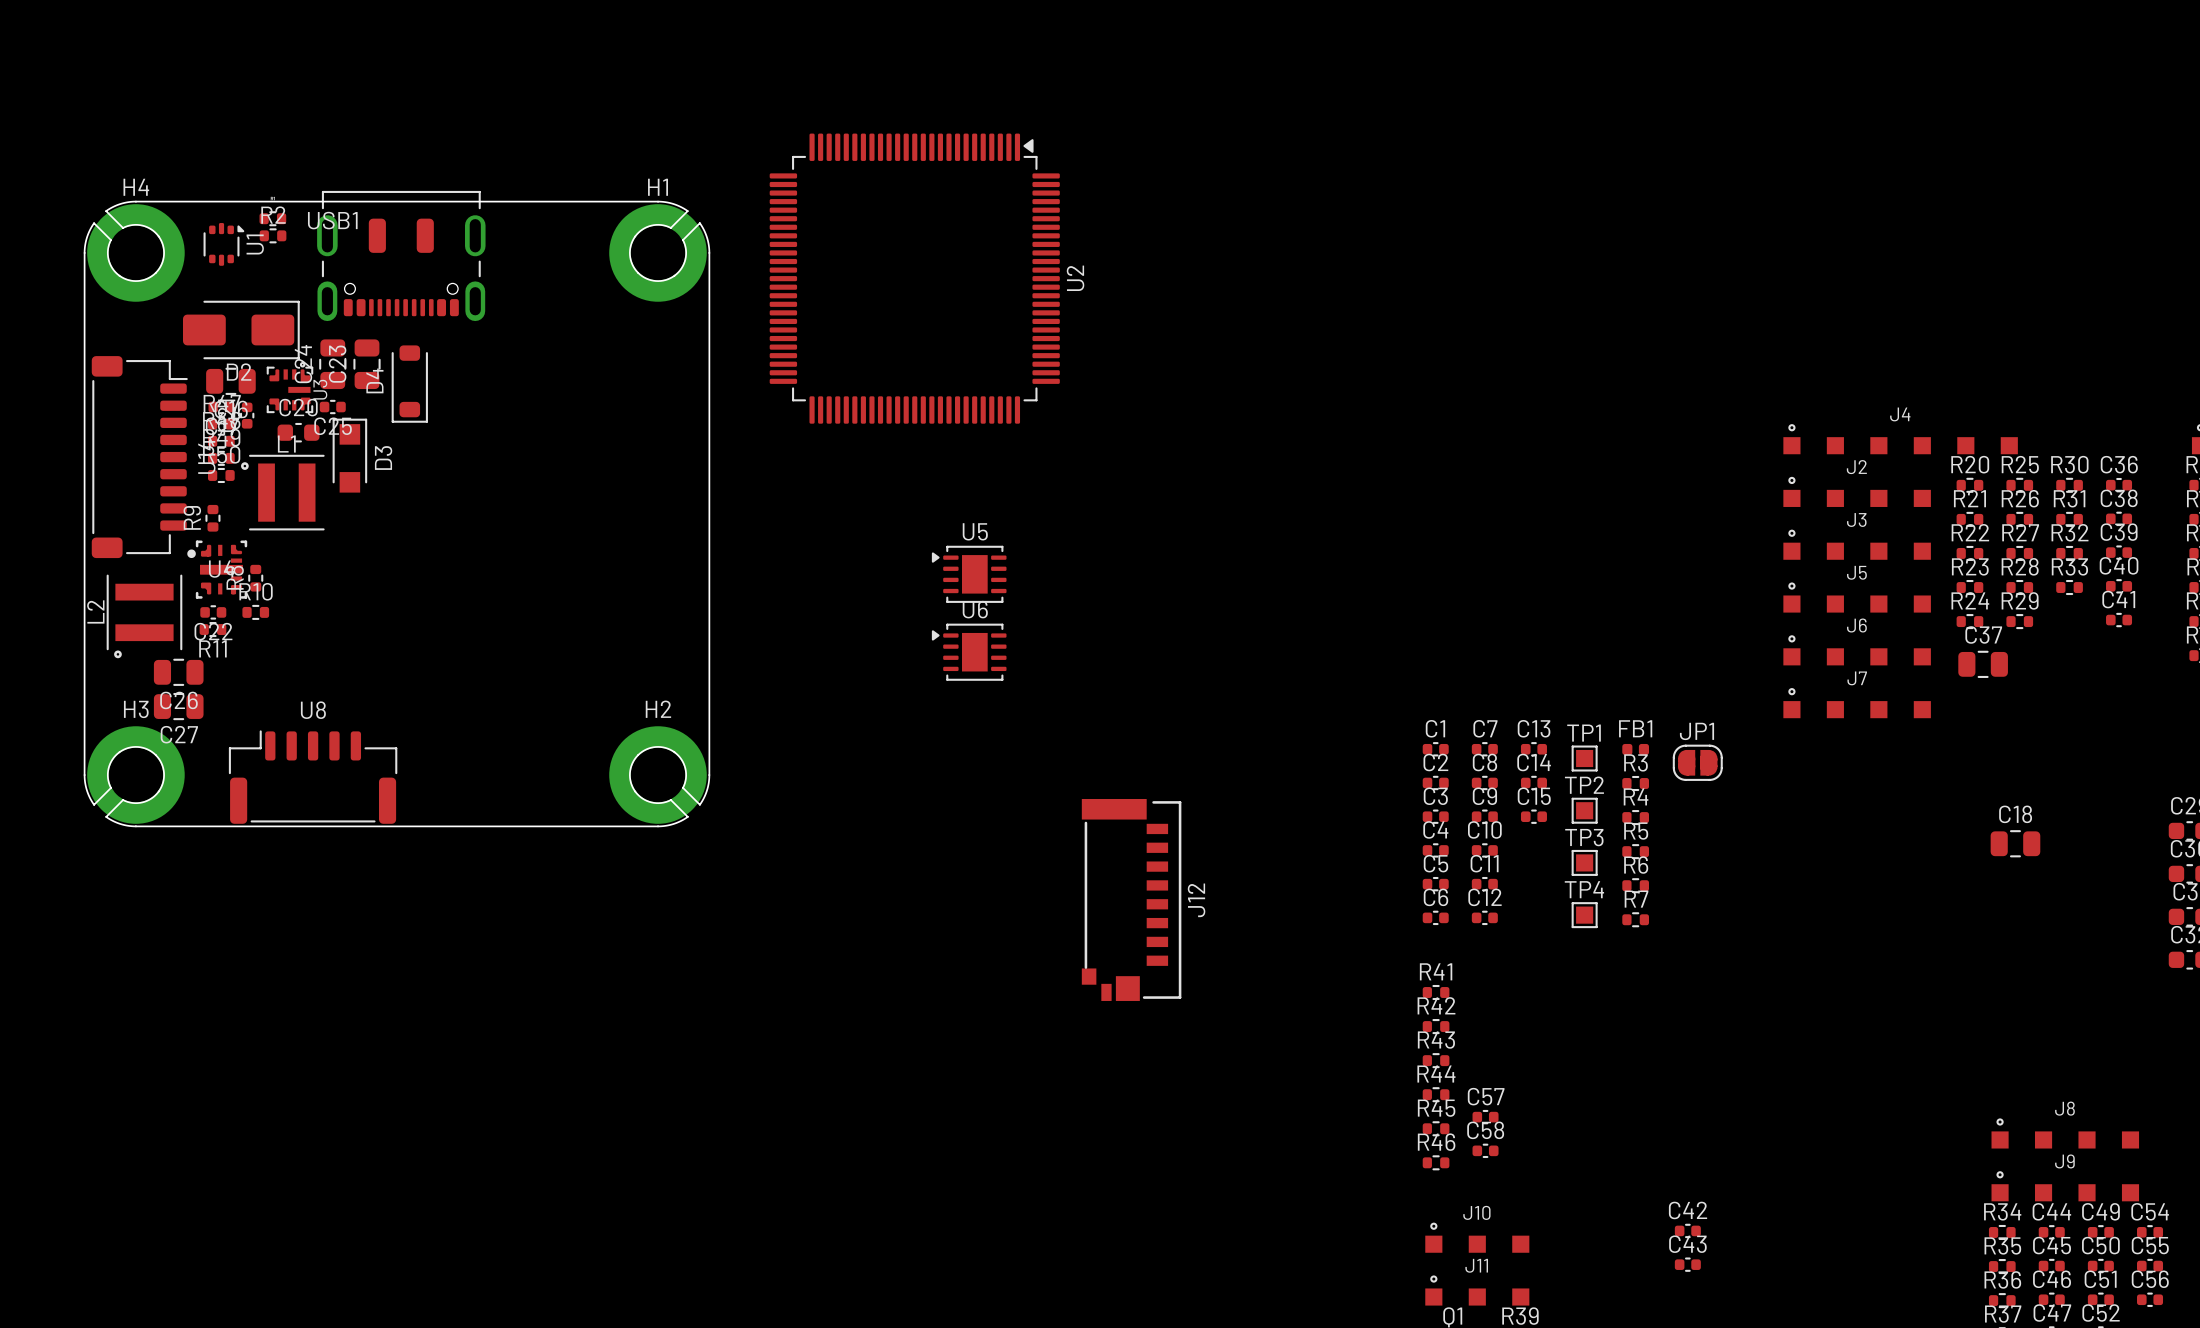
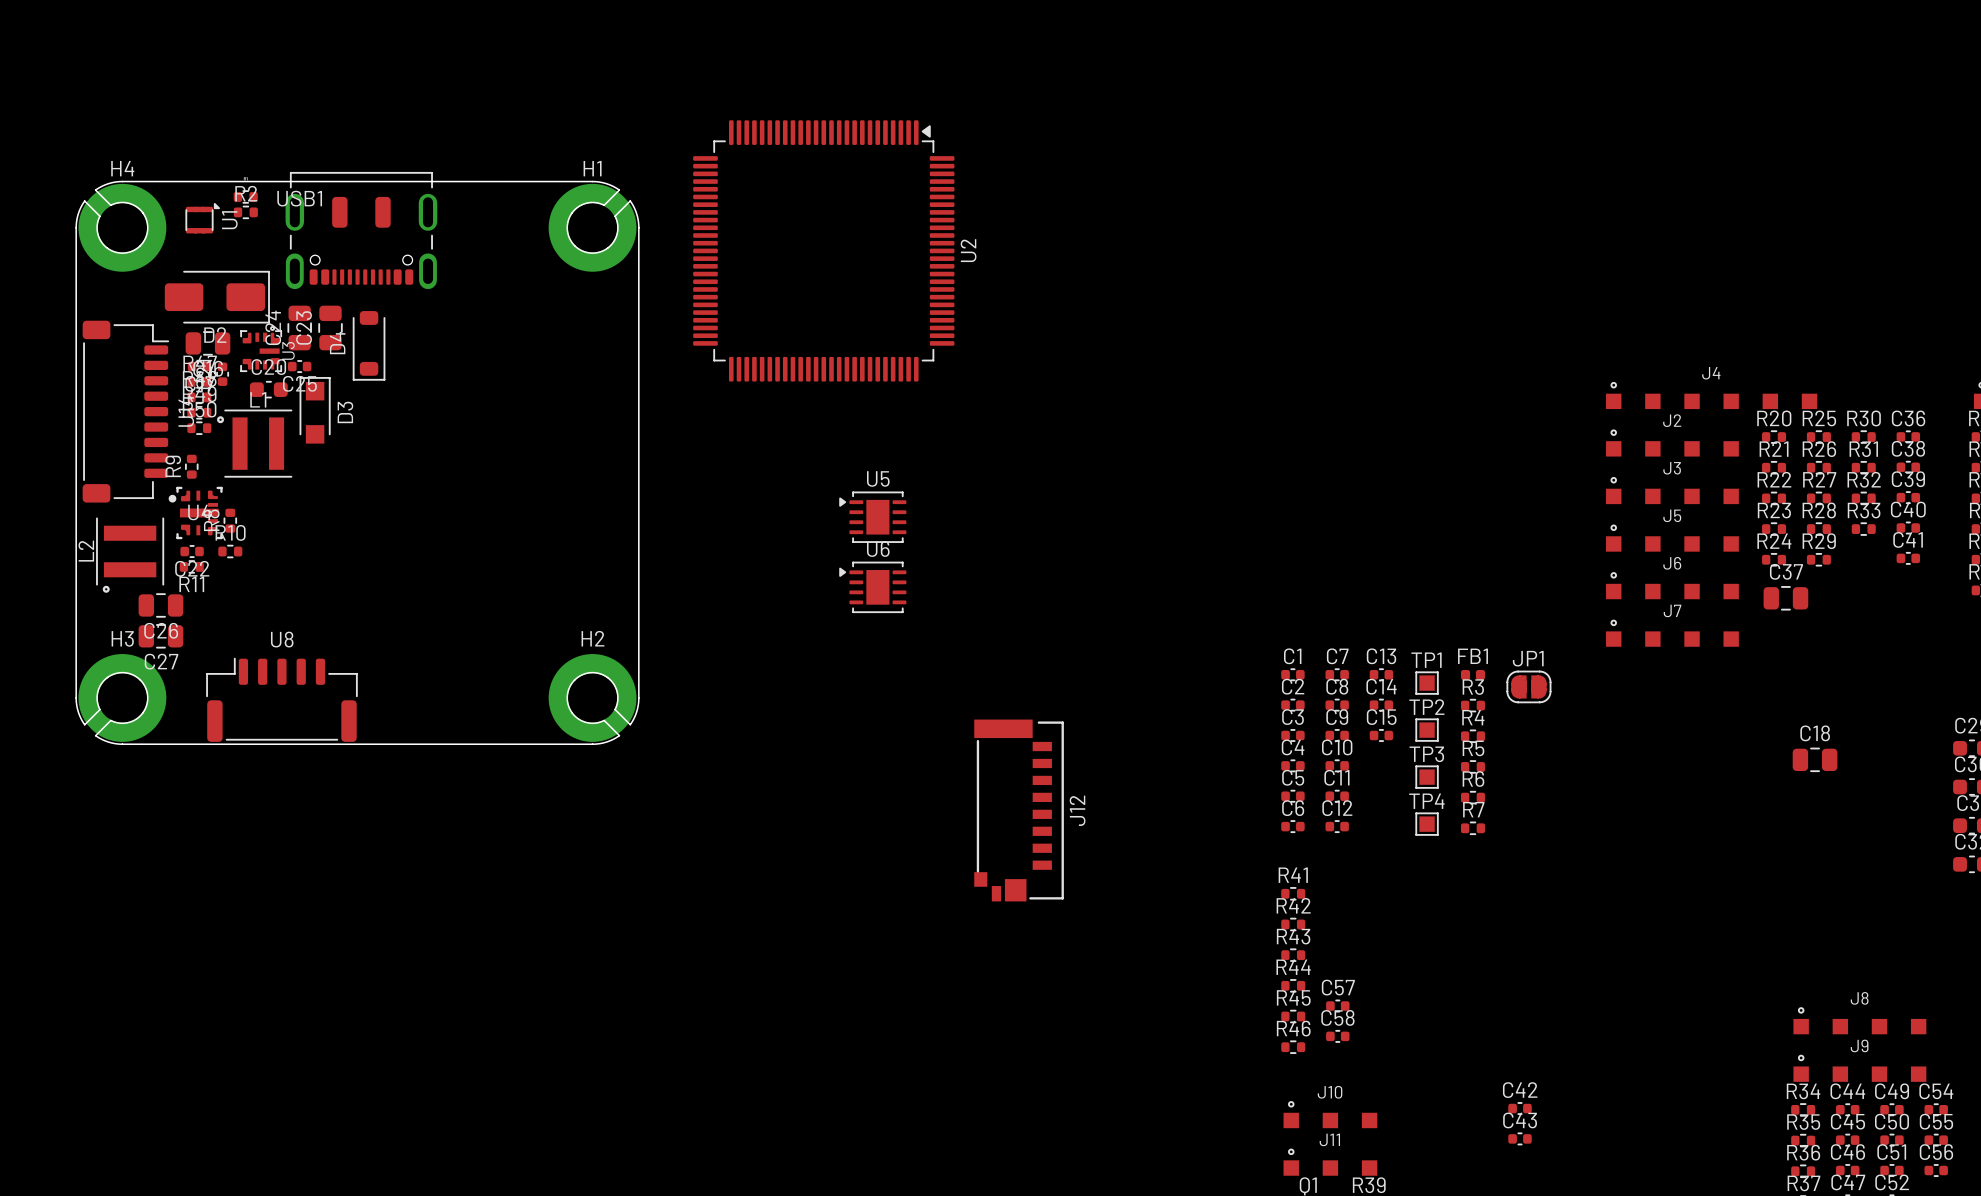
U1 footprint: [203, 223, 245, 266] -> [185, 202, 220, 234]

